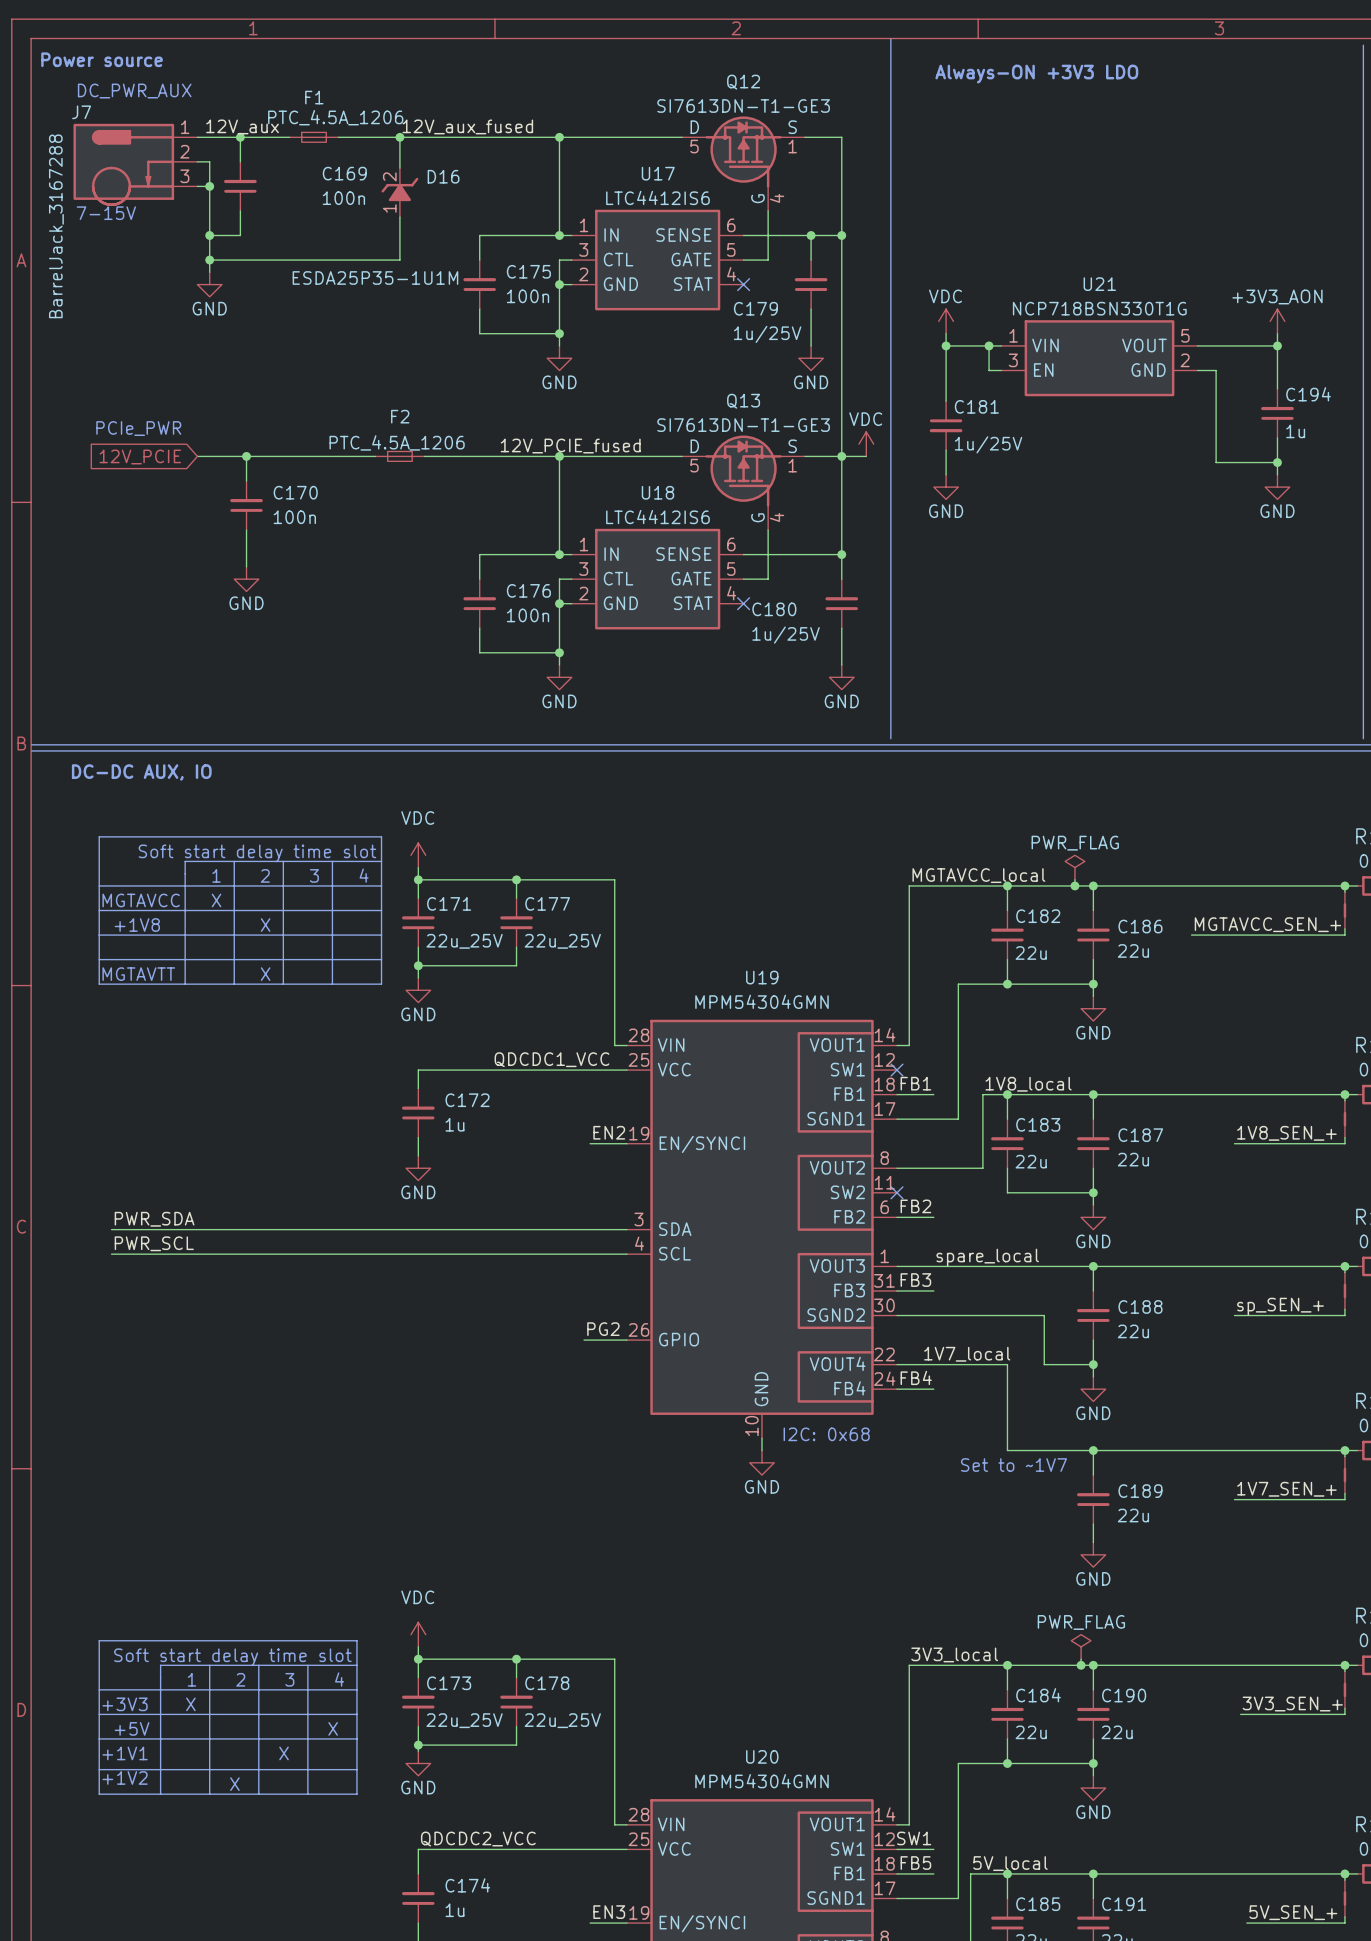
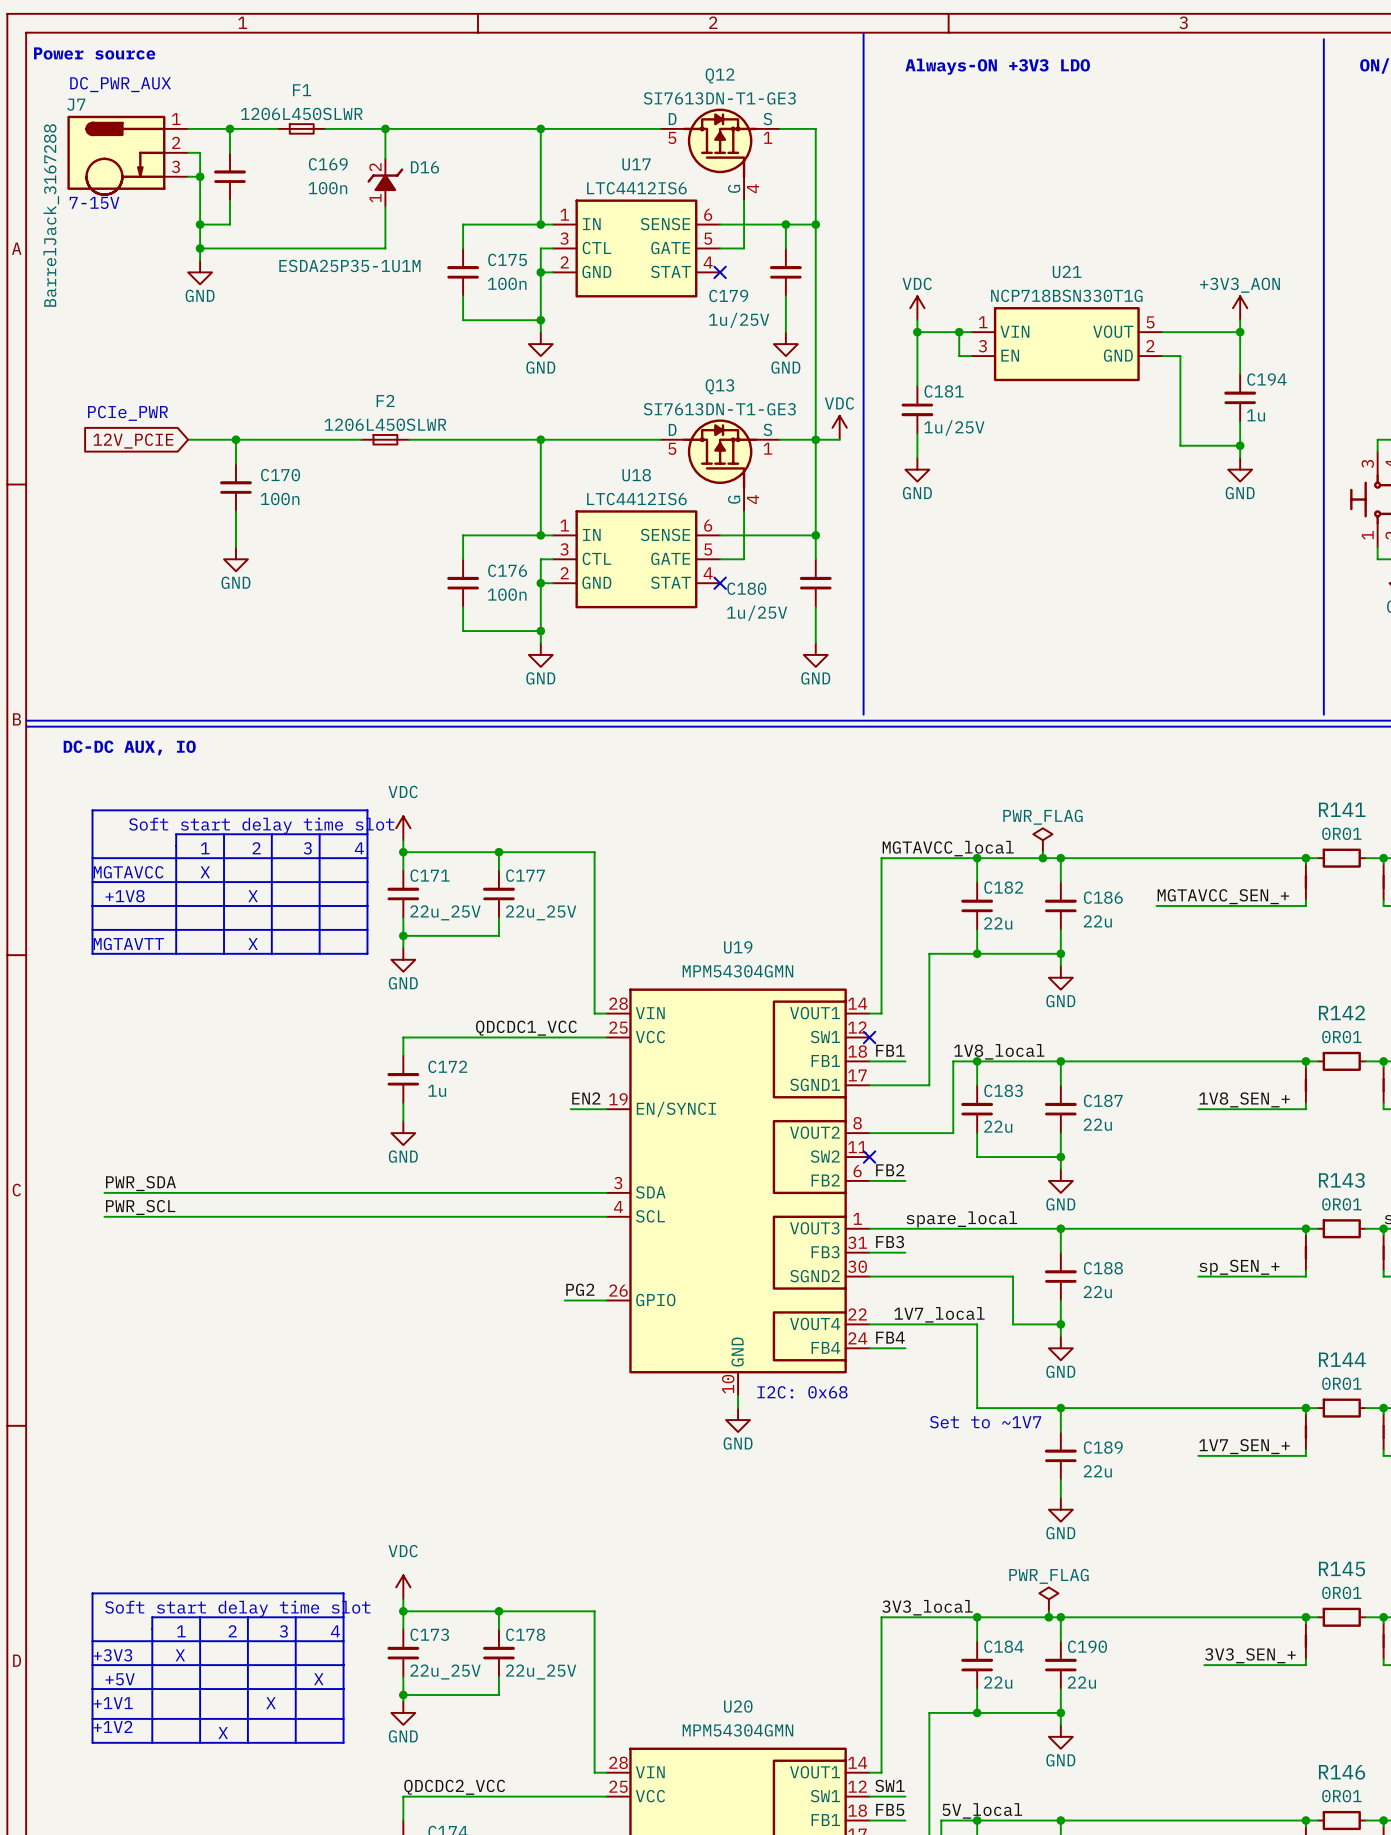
F1 value: PTC_4.5A_1206 (335, 117) -> none
F1 text: none -> 1206L450SLWR (301, 113)
label: 12V_aux (242, 126) -> none
label: 12V_aux_fused (467, 126) -> none
F2 text: none -> 1206L450SLWR (385, 424)
F2 value: PTC_4.5A_1206 (397, 442) -> none
label: 12V_PCIE_fused (570, 446) -> none

